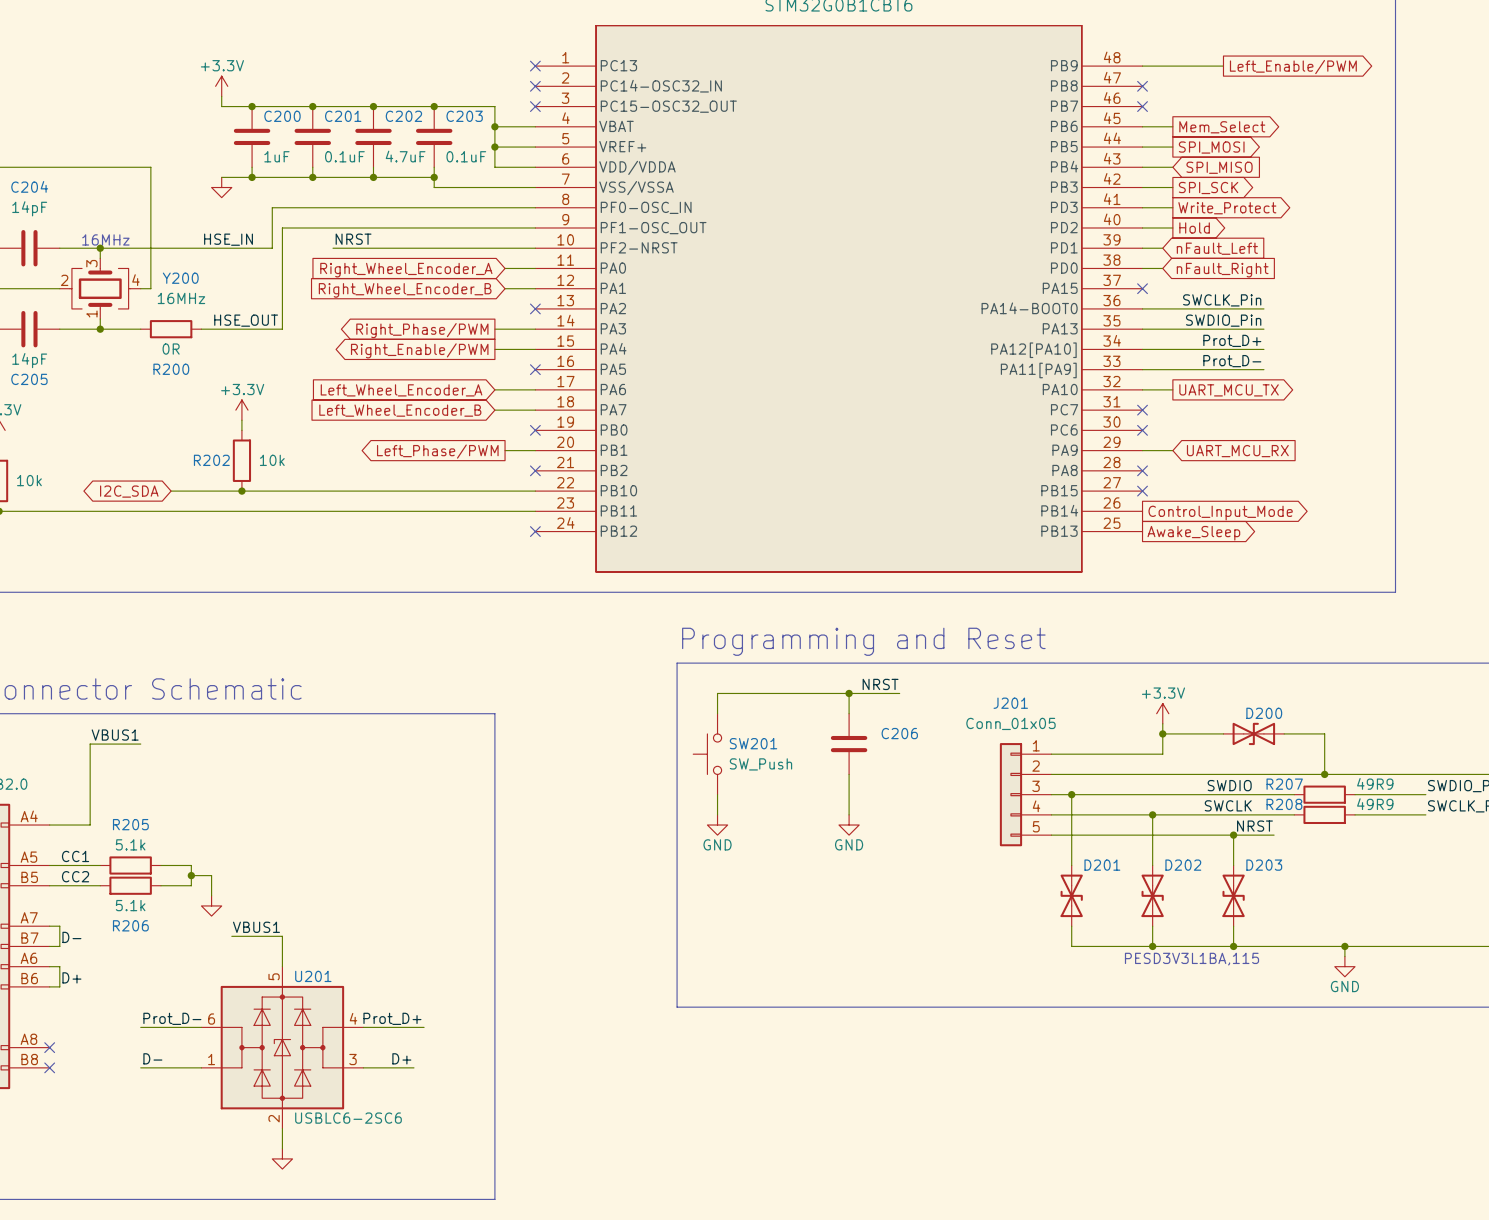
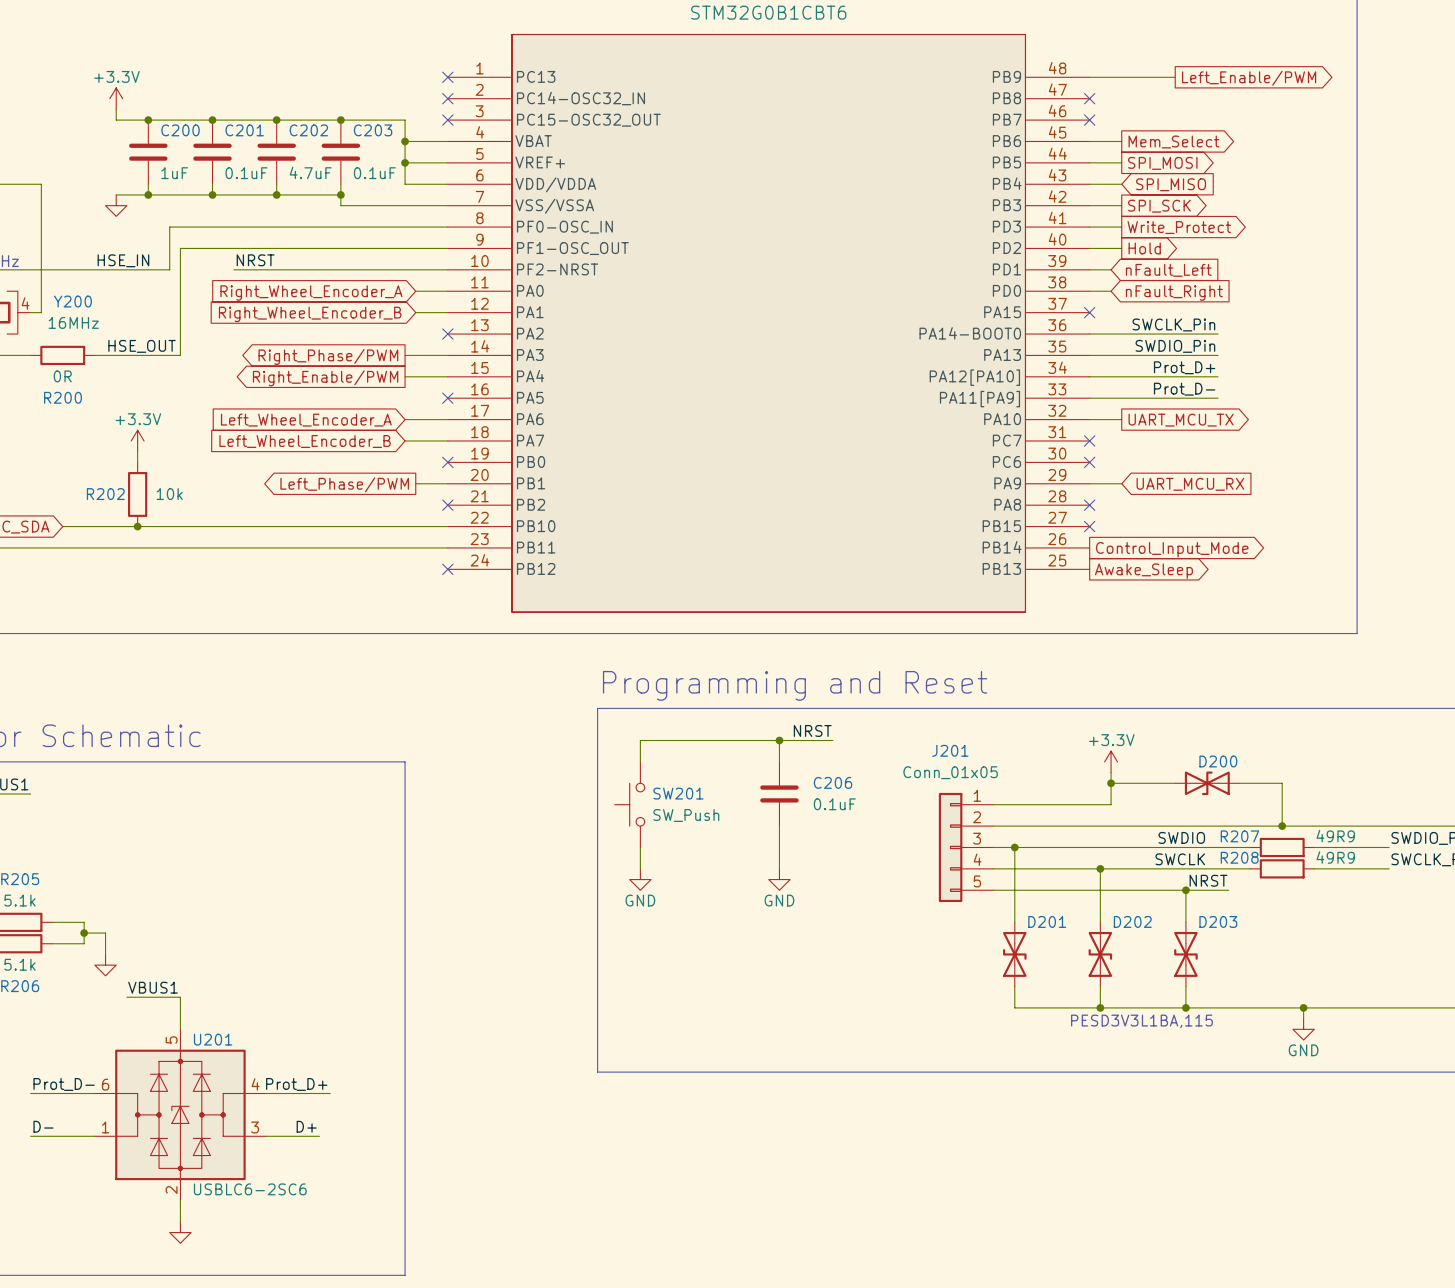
C206 value: none -> 0.1uF (834, 804)

